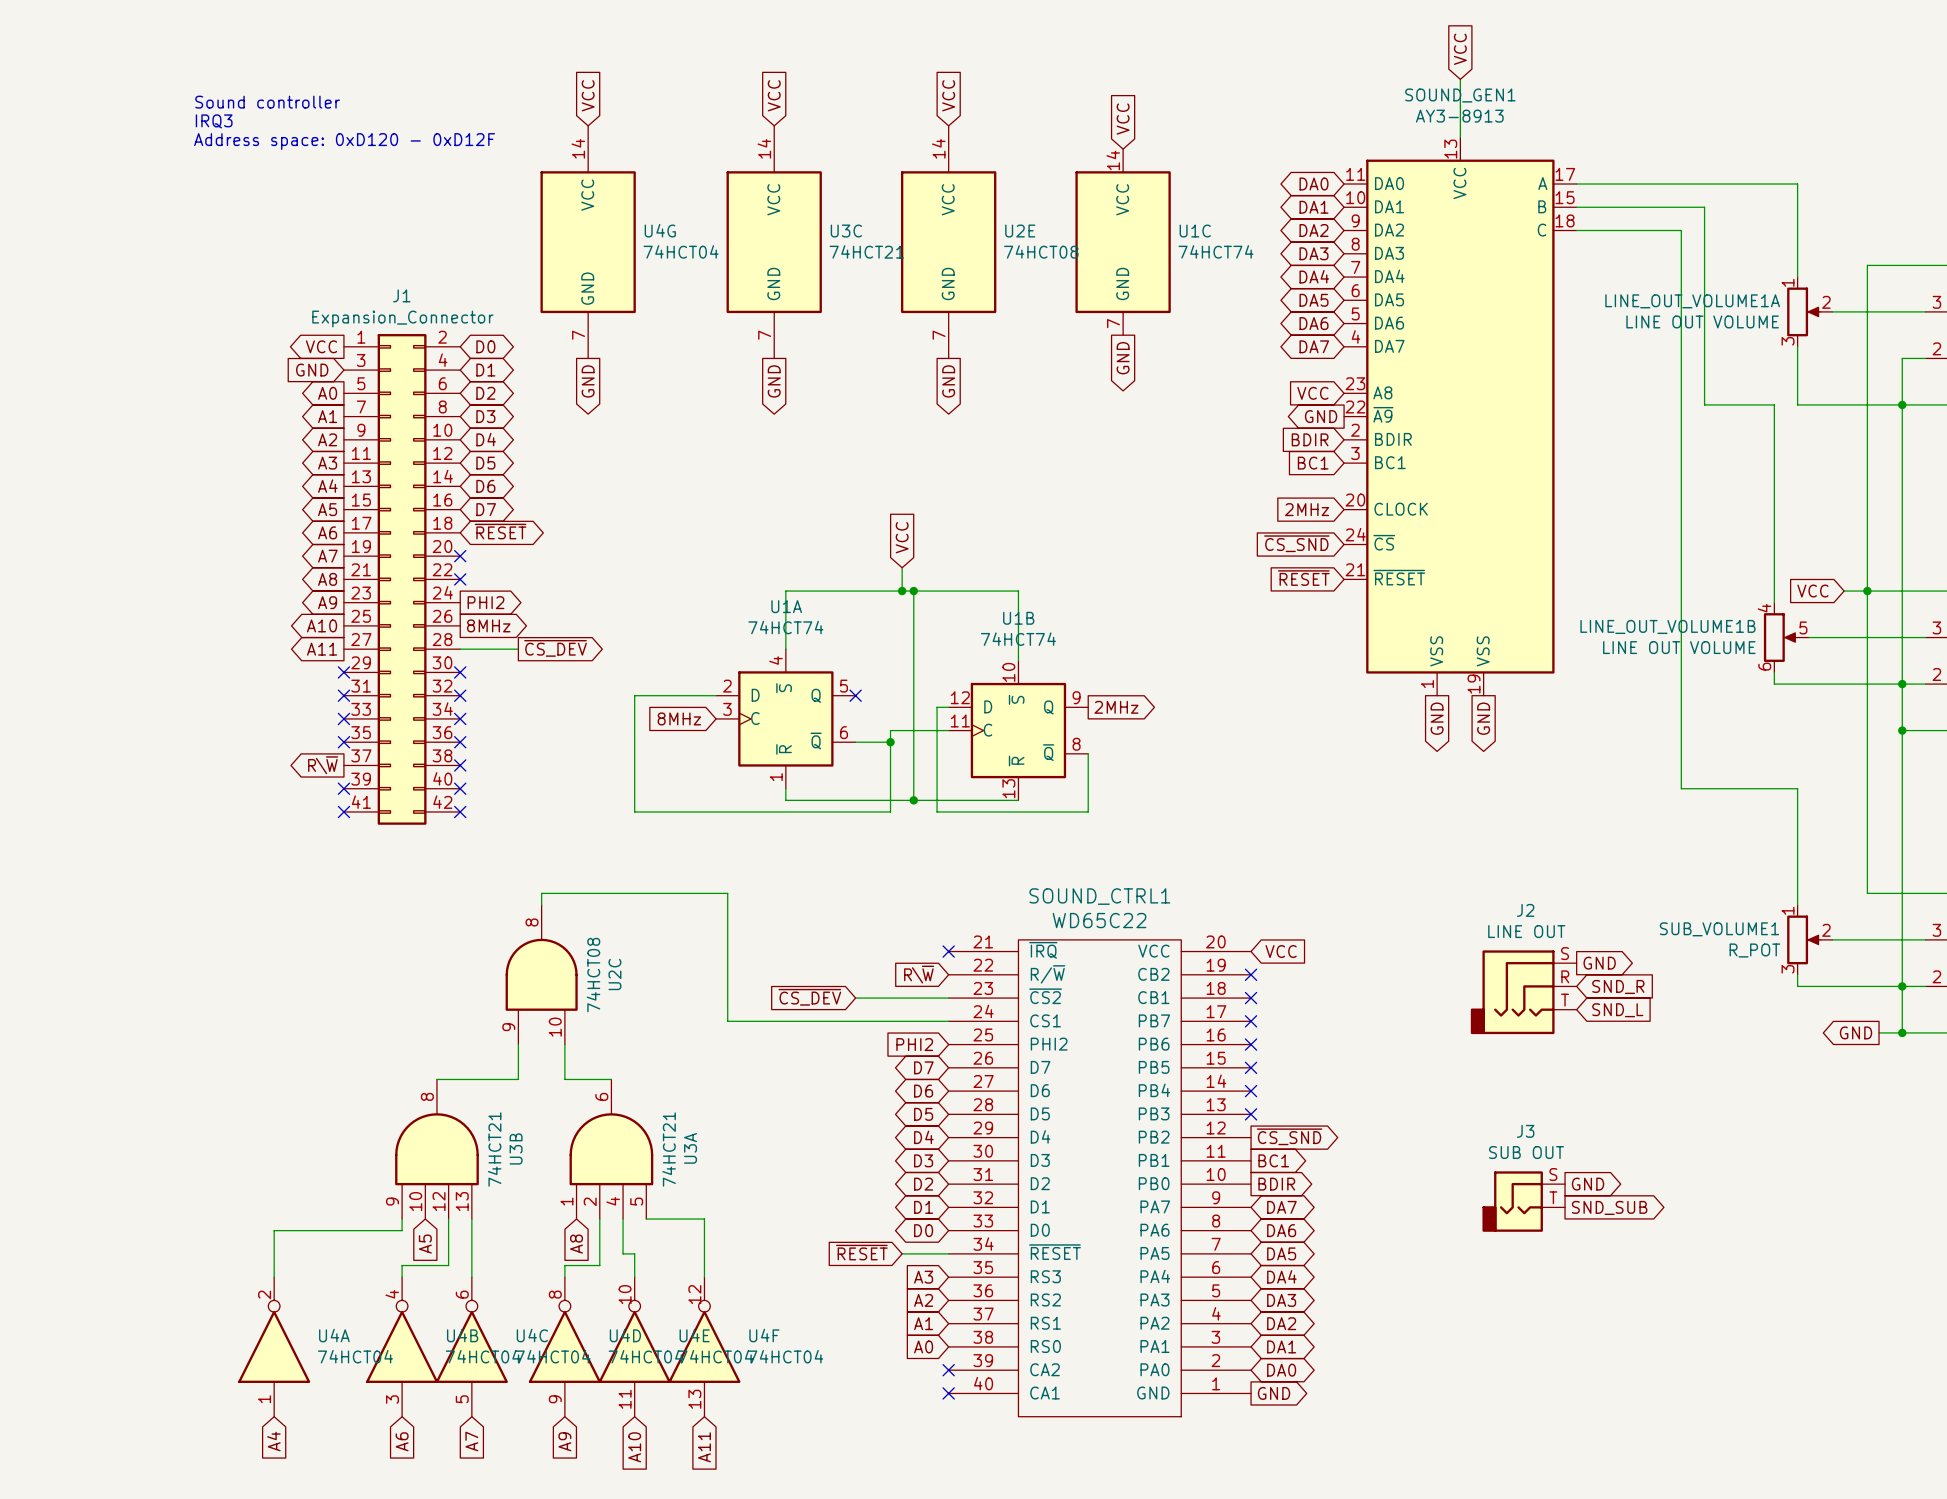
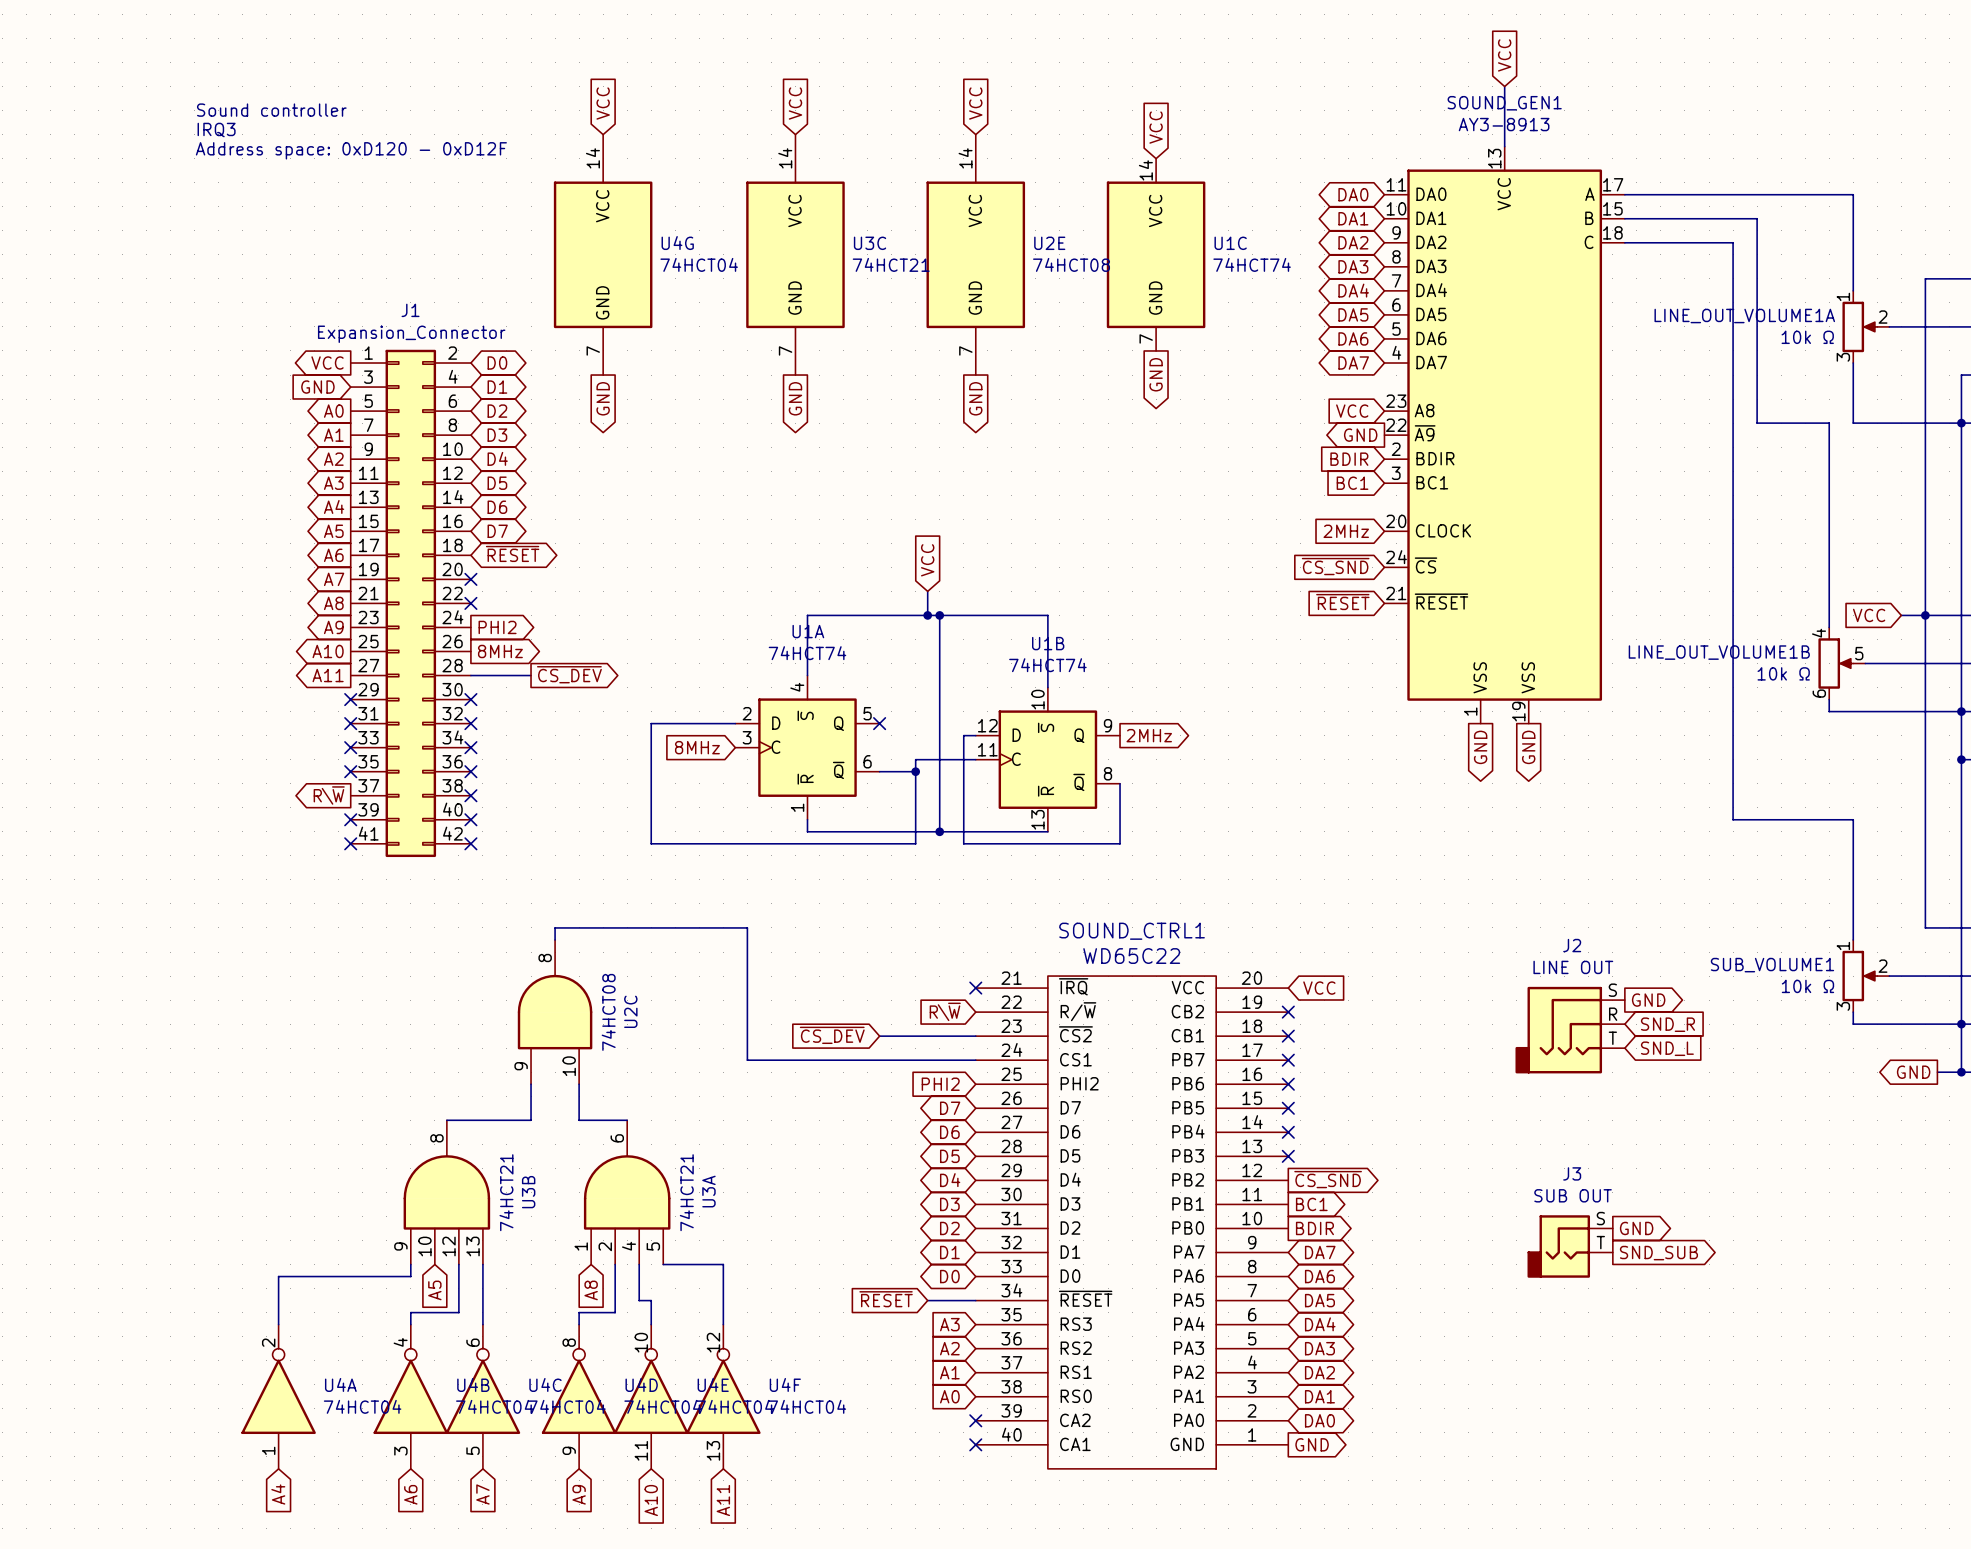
LINE_OUT_VOLUME1A value: LINE OUT VOLUME (1702, 321) -> 10k Ω (1807, 337)
LINE_OUT_VOLUME1B value: LINE OUT VOLUME (1679, 647) -> 10k Ω (1783, 673)
SUB_VOLUME1 value: R_POT (1754, 950) -> 10k Ω (1807, 986)

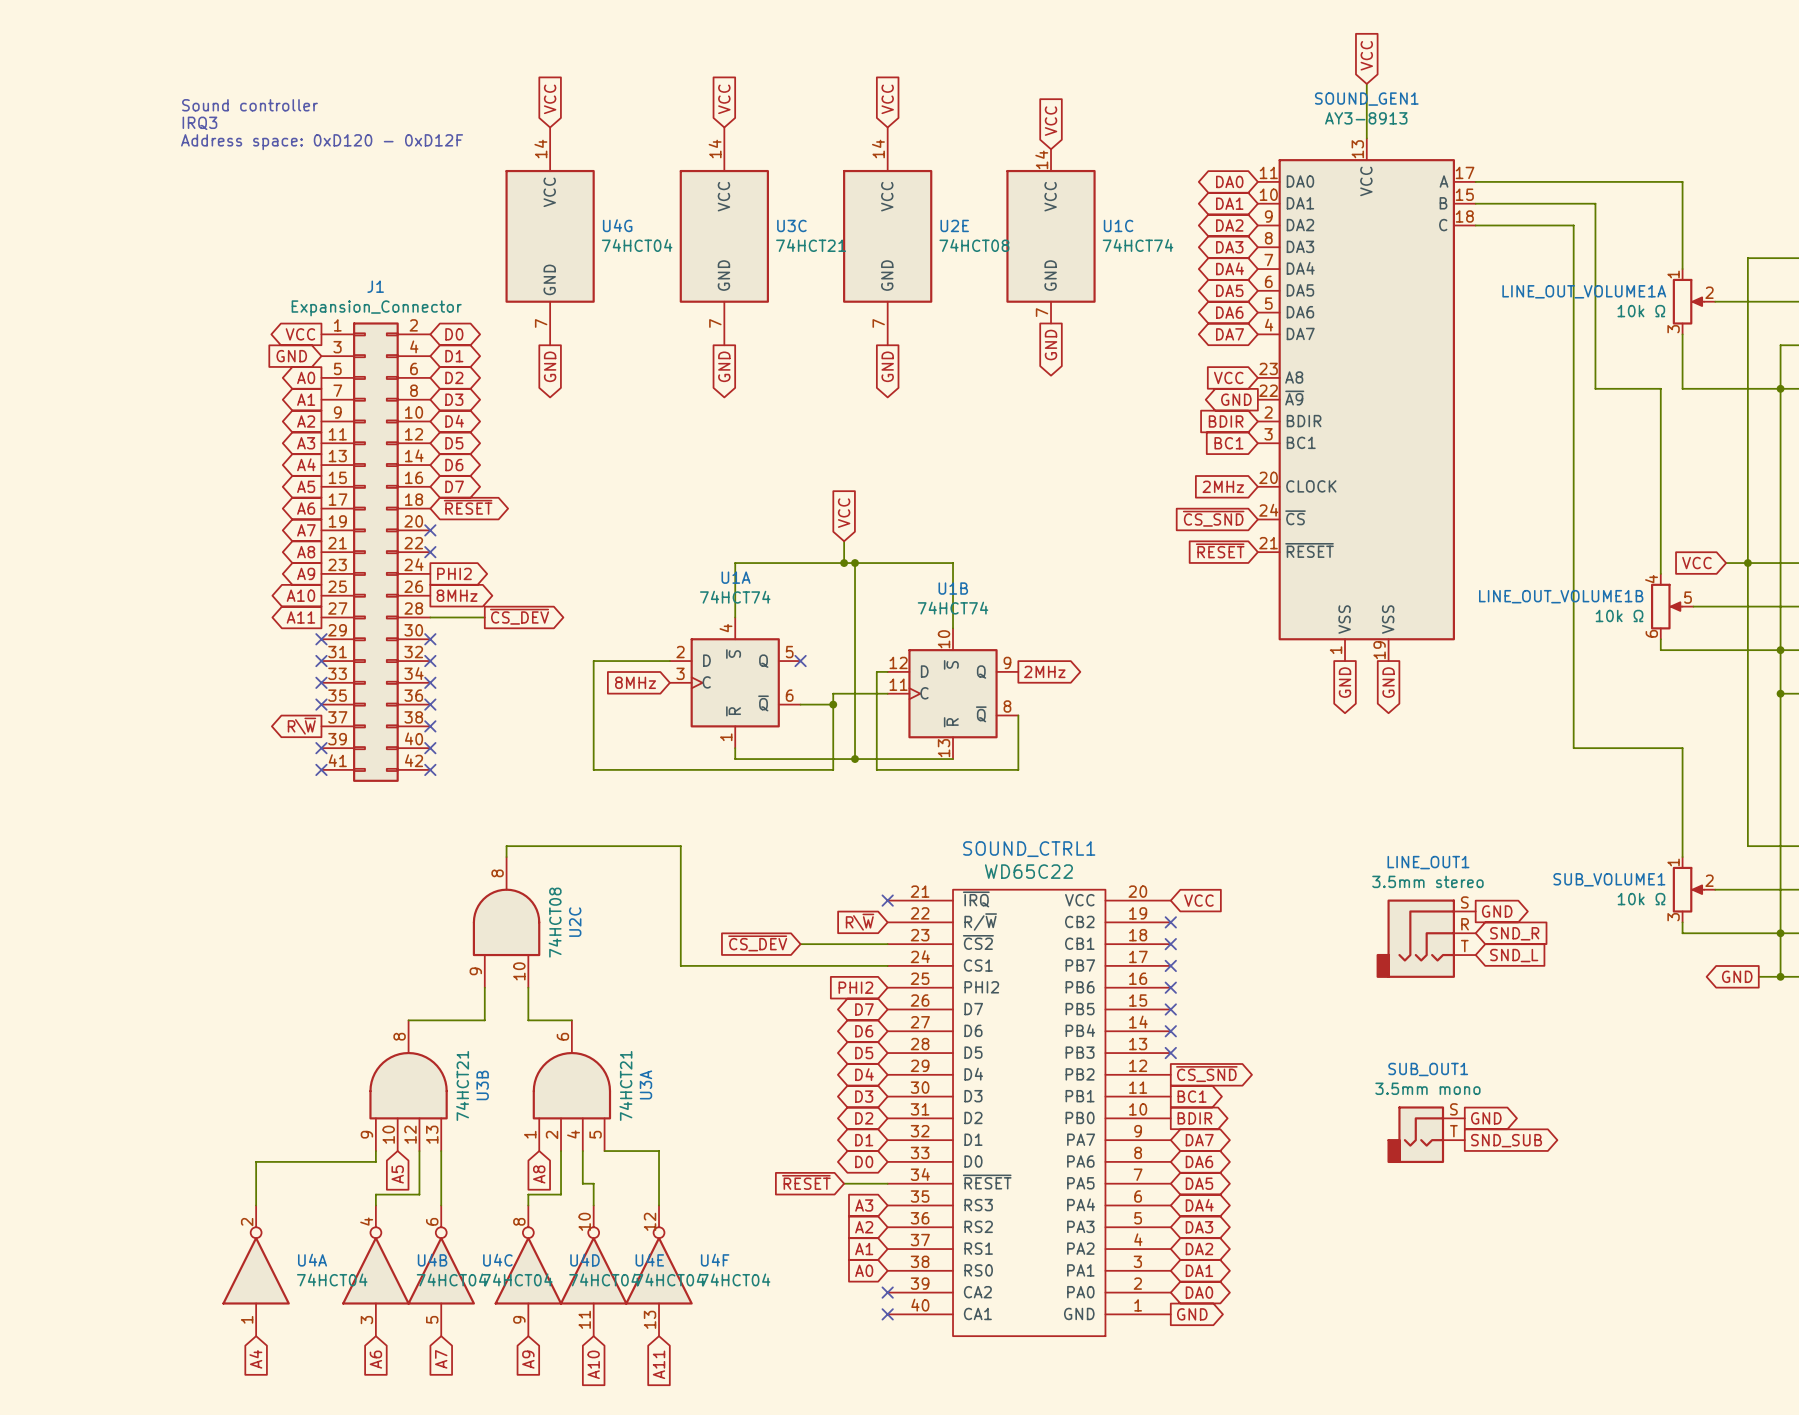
J2 name: J2 (1572, 945) -> LINE_OUT1 (1428, 862)
J2 value: LINE OUT (1573, 967) -> 3.5mm stereo (1427, 881)
J3 name: J3 (1572, 1173) -> SUB_OUT1 (1428, 1069)
J3 value: SUB OUT (1573, 1195) -> 3.5mm mono (1427, 1088)

